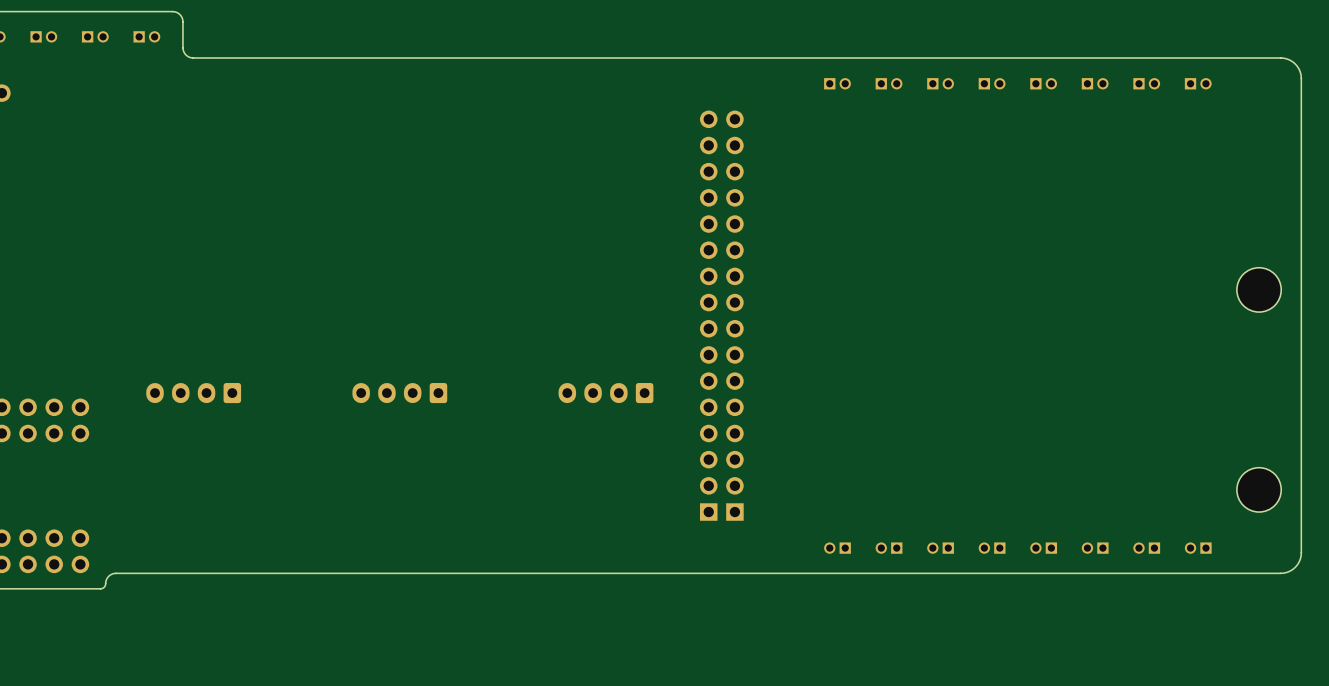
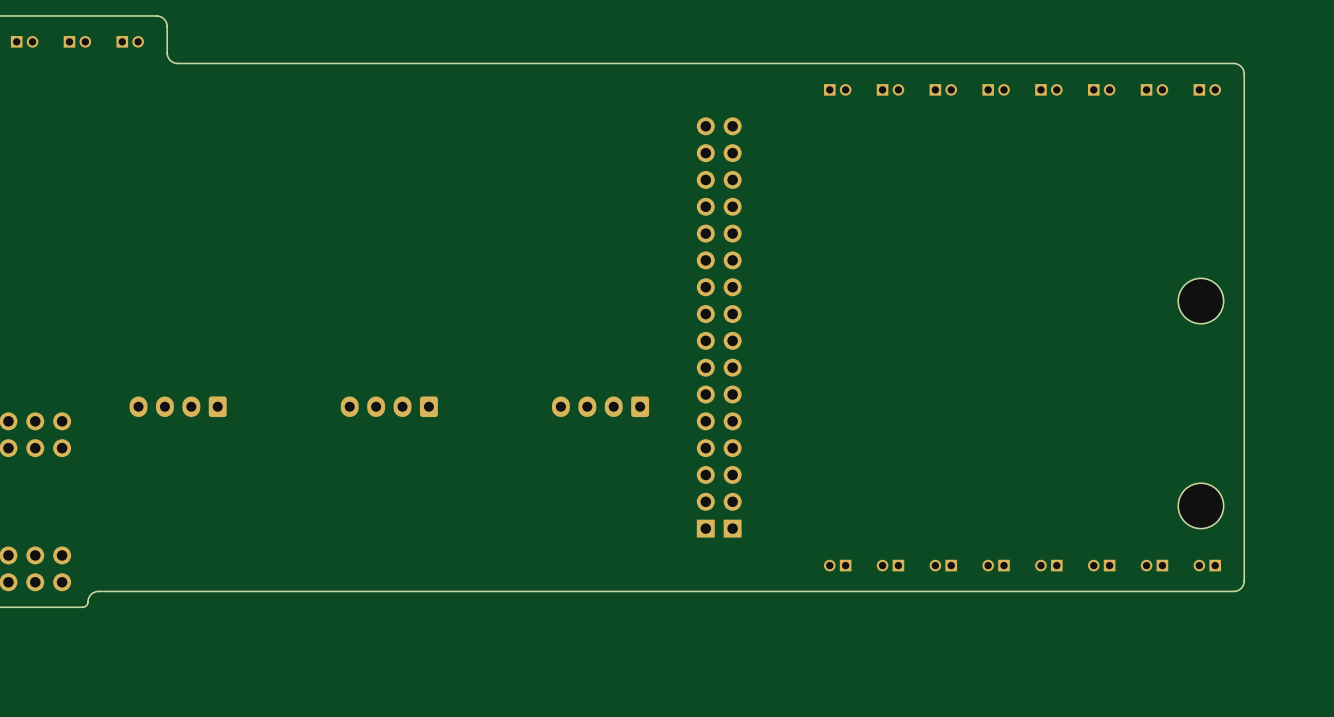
board edge: (1224, 57) (1285, 58) (1296, 65) (1301, 78) (1301, 555) (1295, 567) (1285, 572) (1224, 573) -> (1233, 63) (1241, 66) (1244, 74) (1244, 580) (1241, 588) (1233, 591)
part position: (1259, 289) -> (1200, 301)
part position: (1259, 489) -> (1200, 505)

